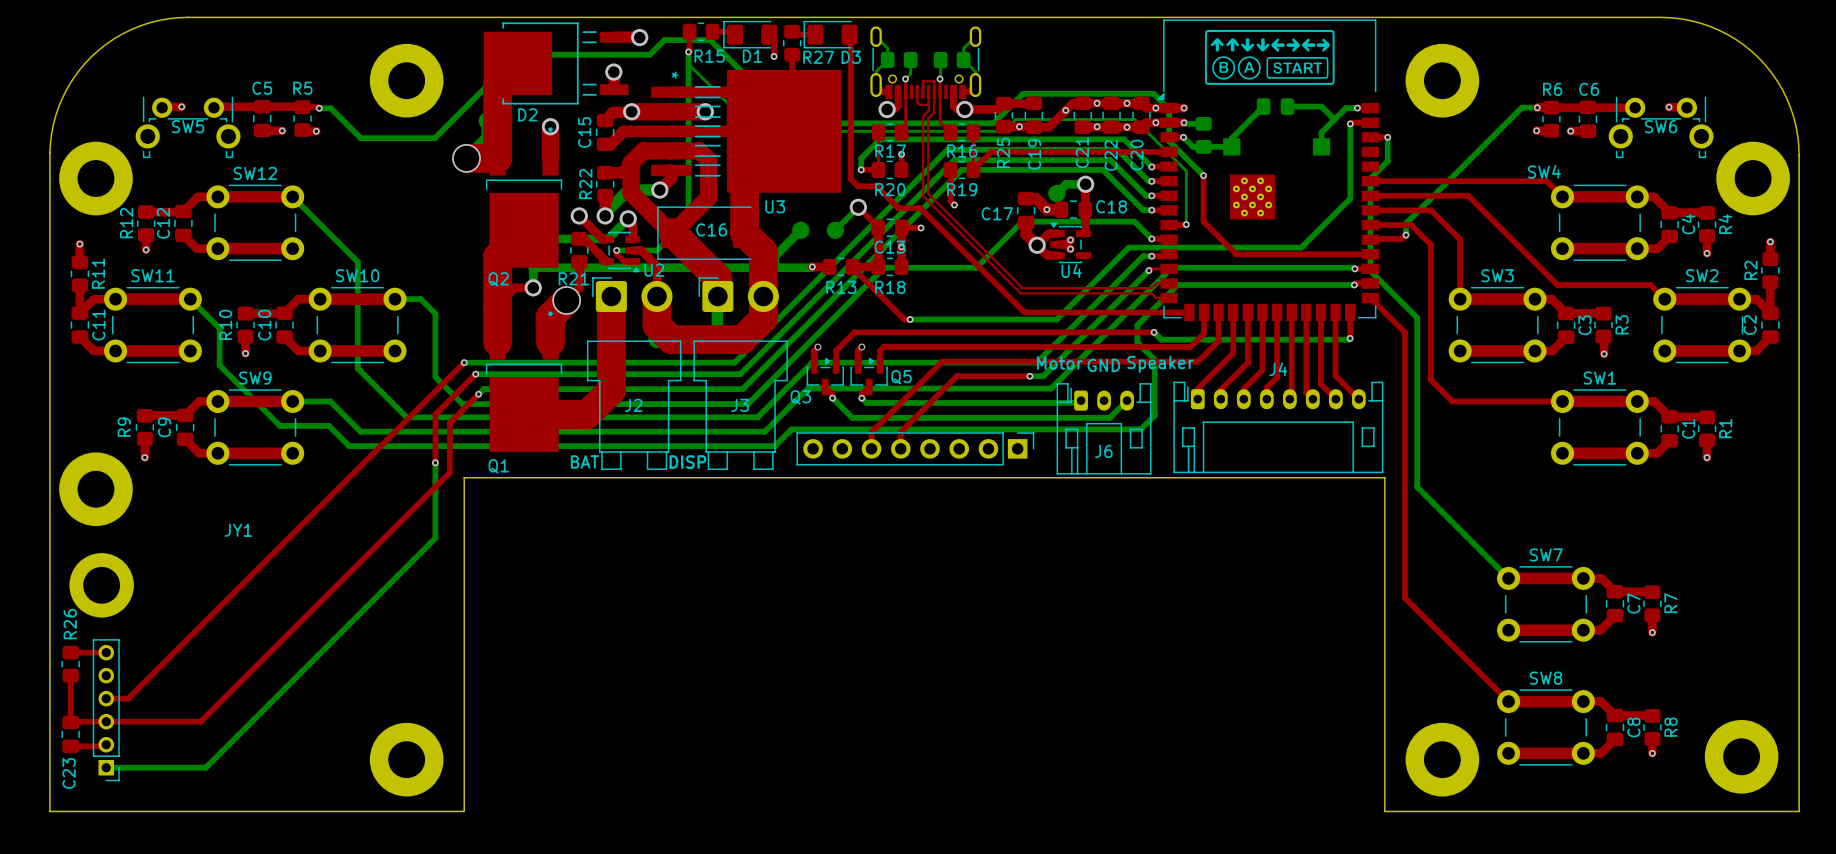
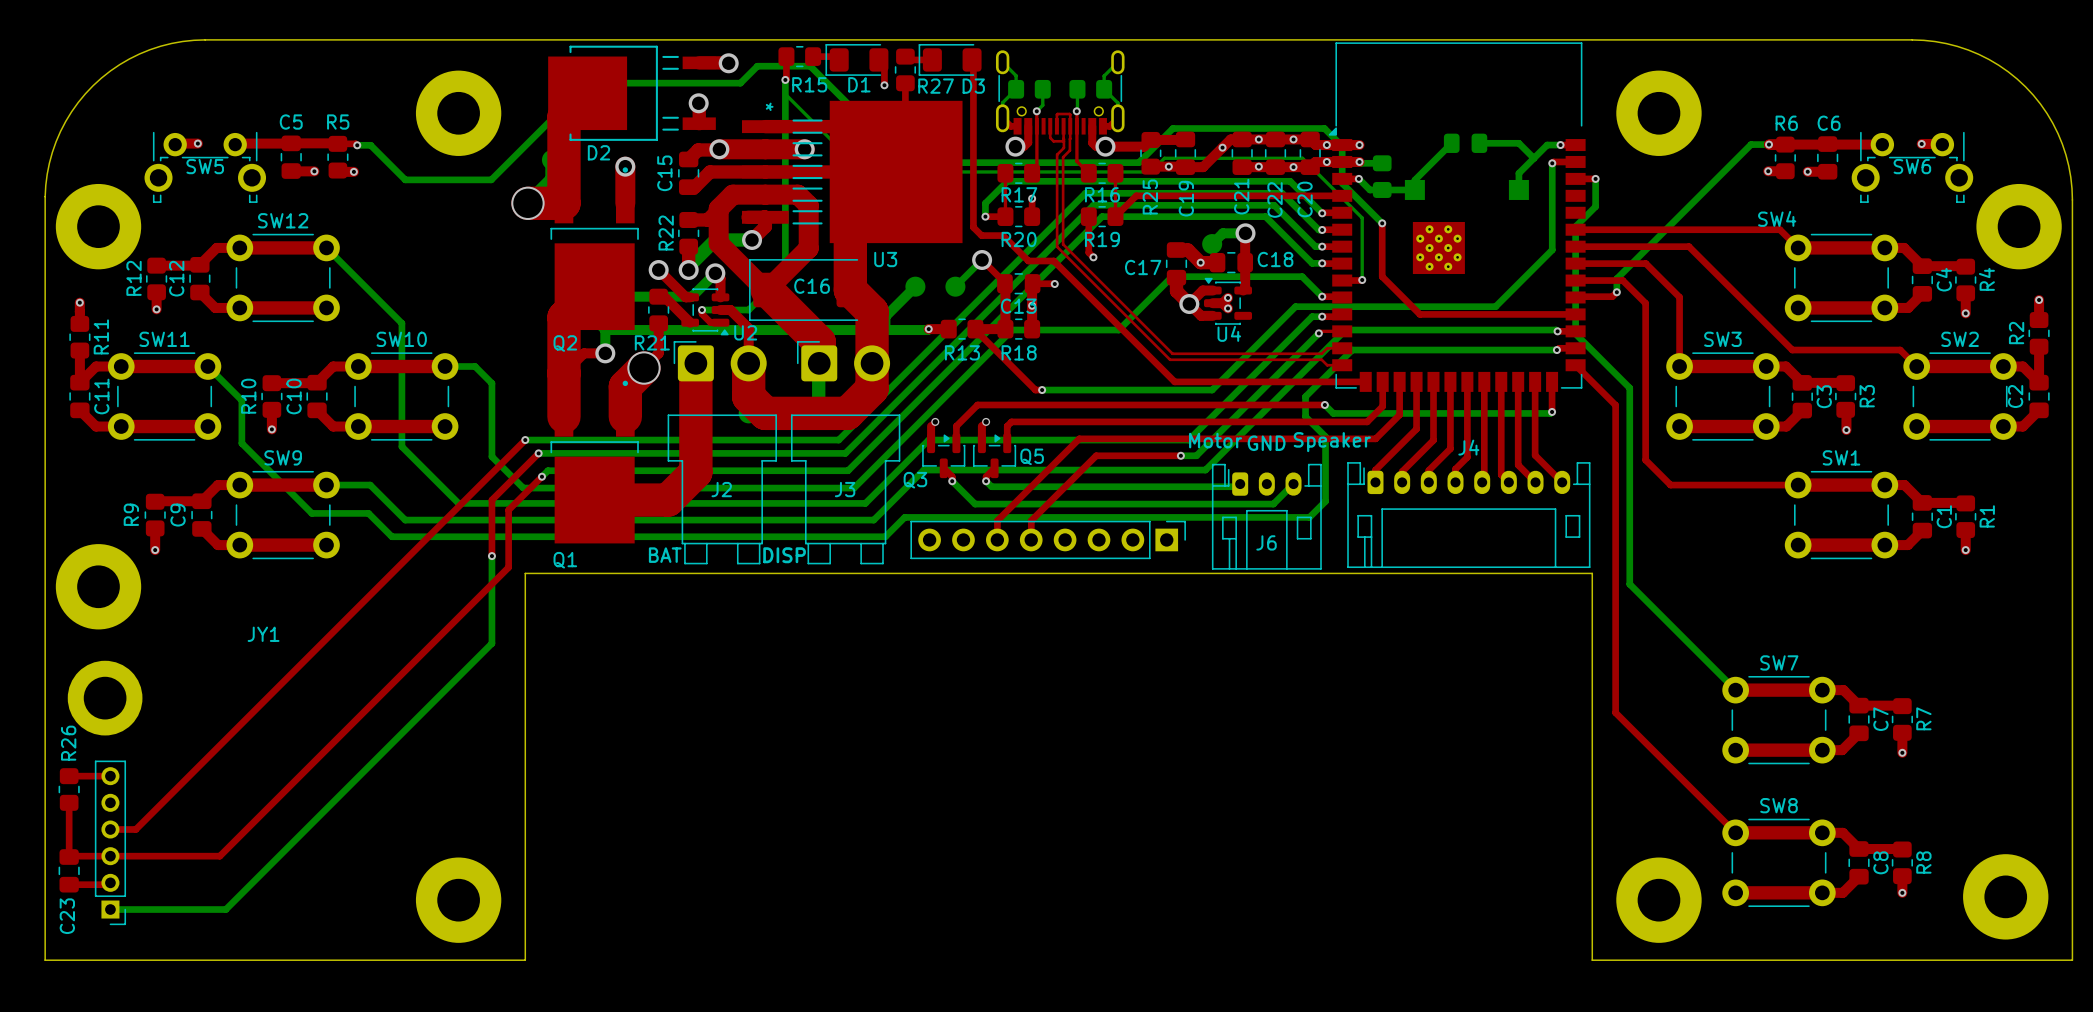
drawing: [1204, 29, 1335, 85] -> none

